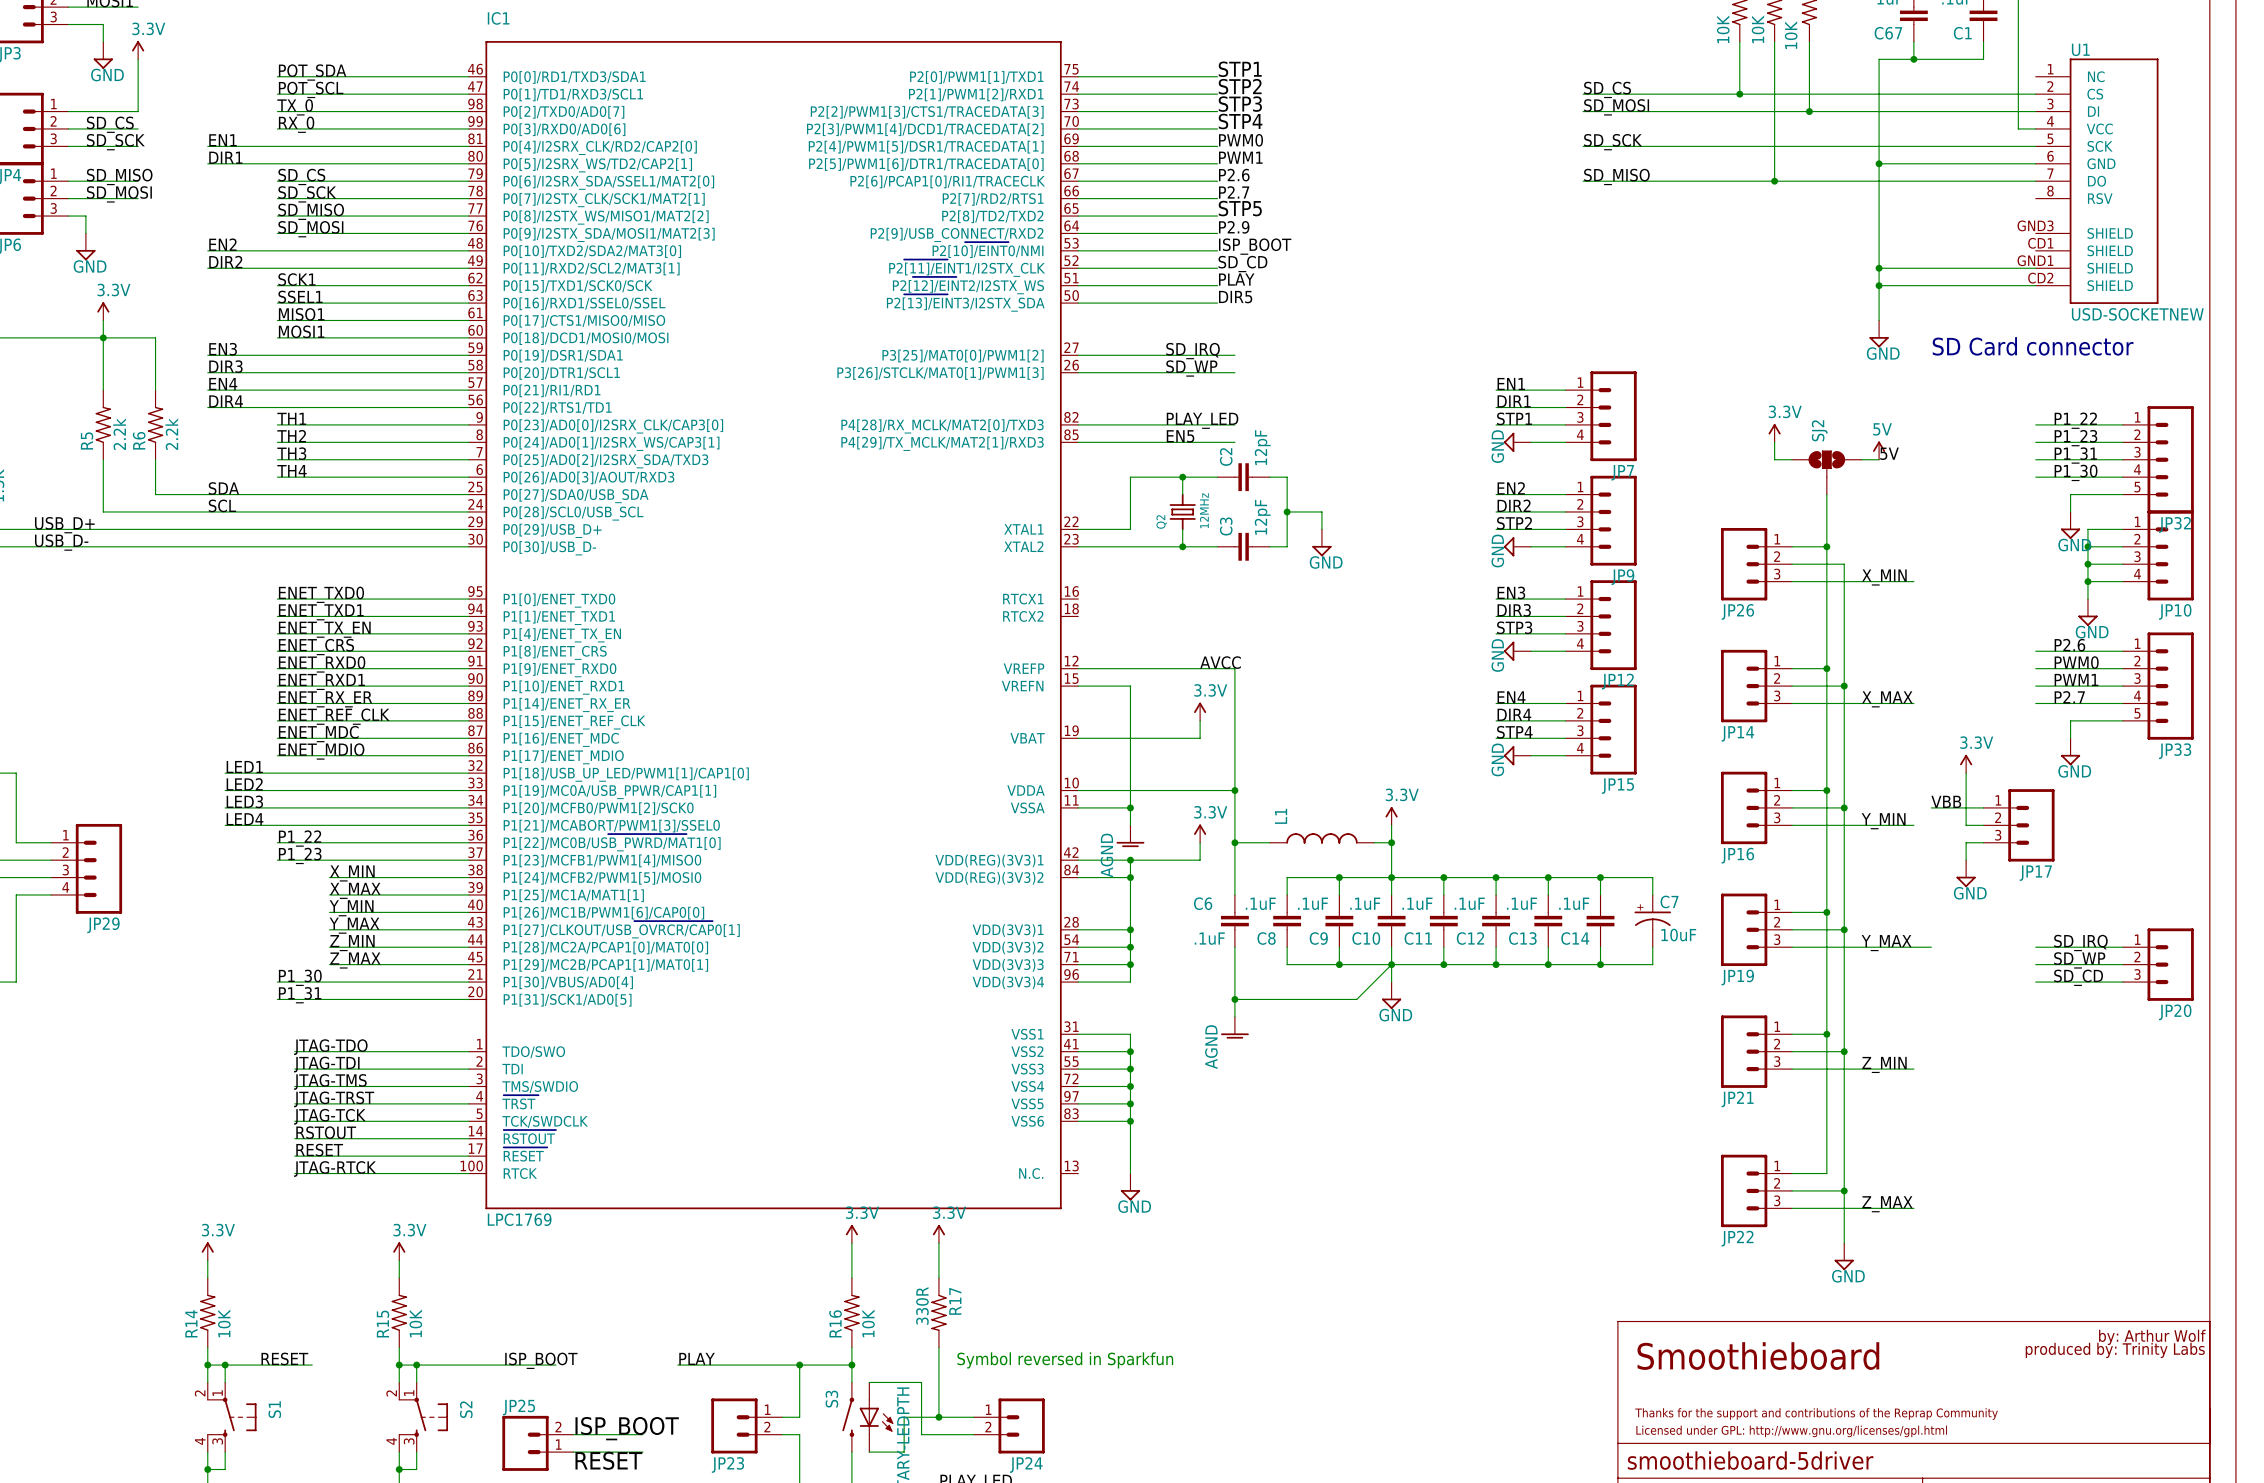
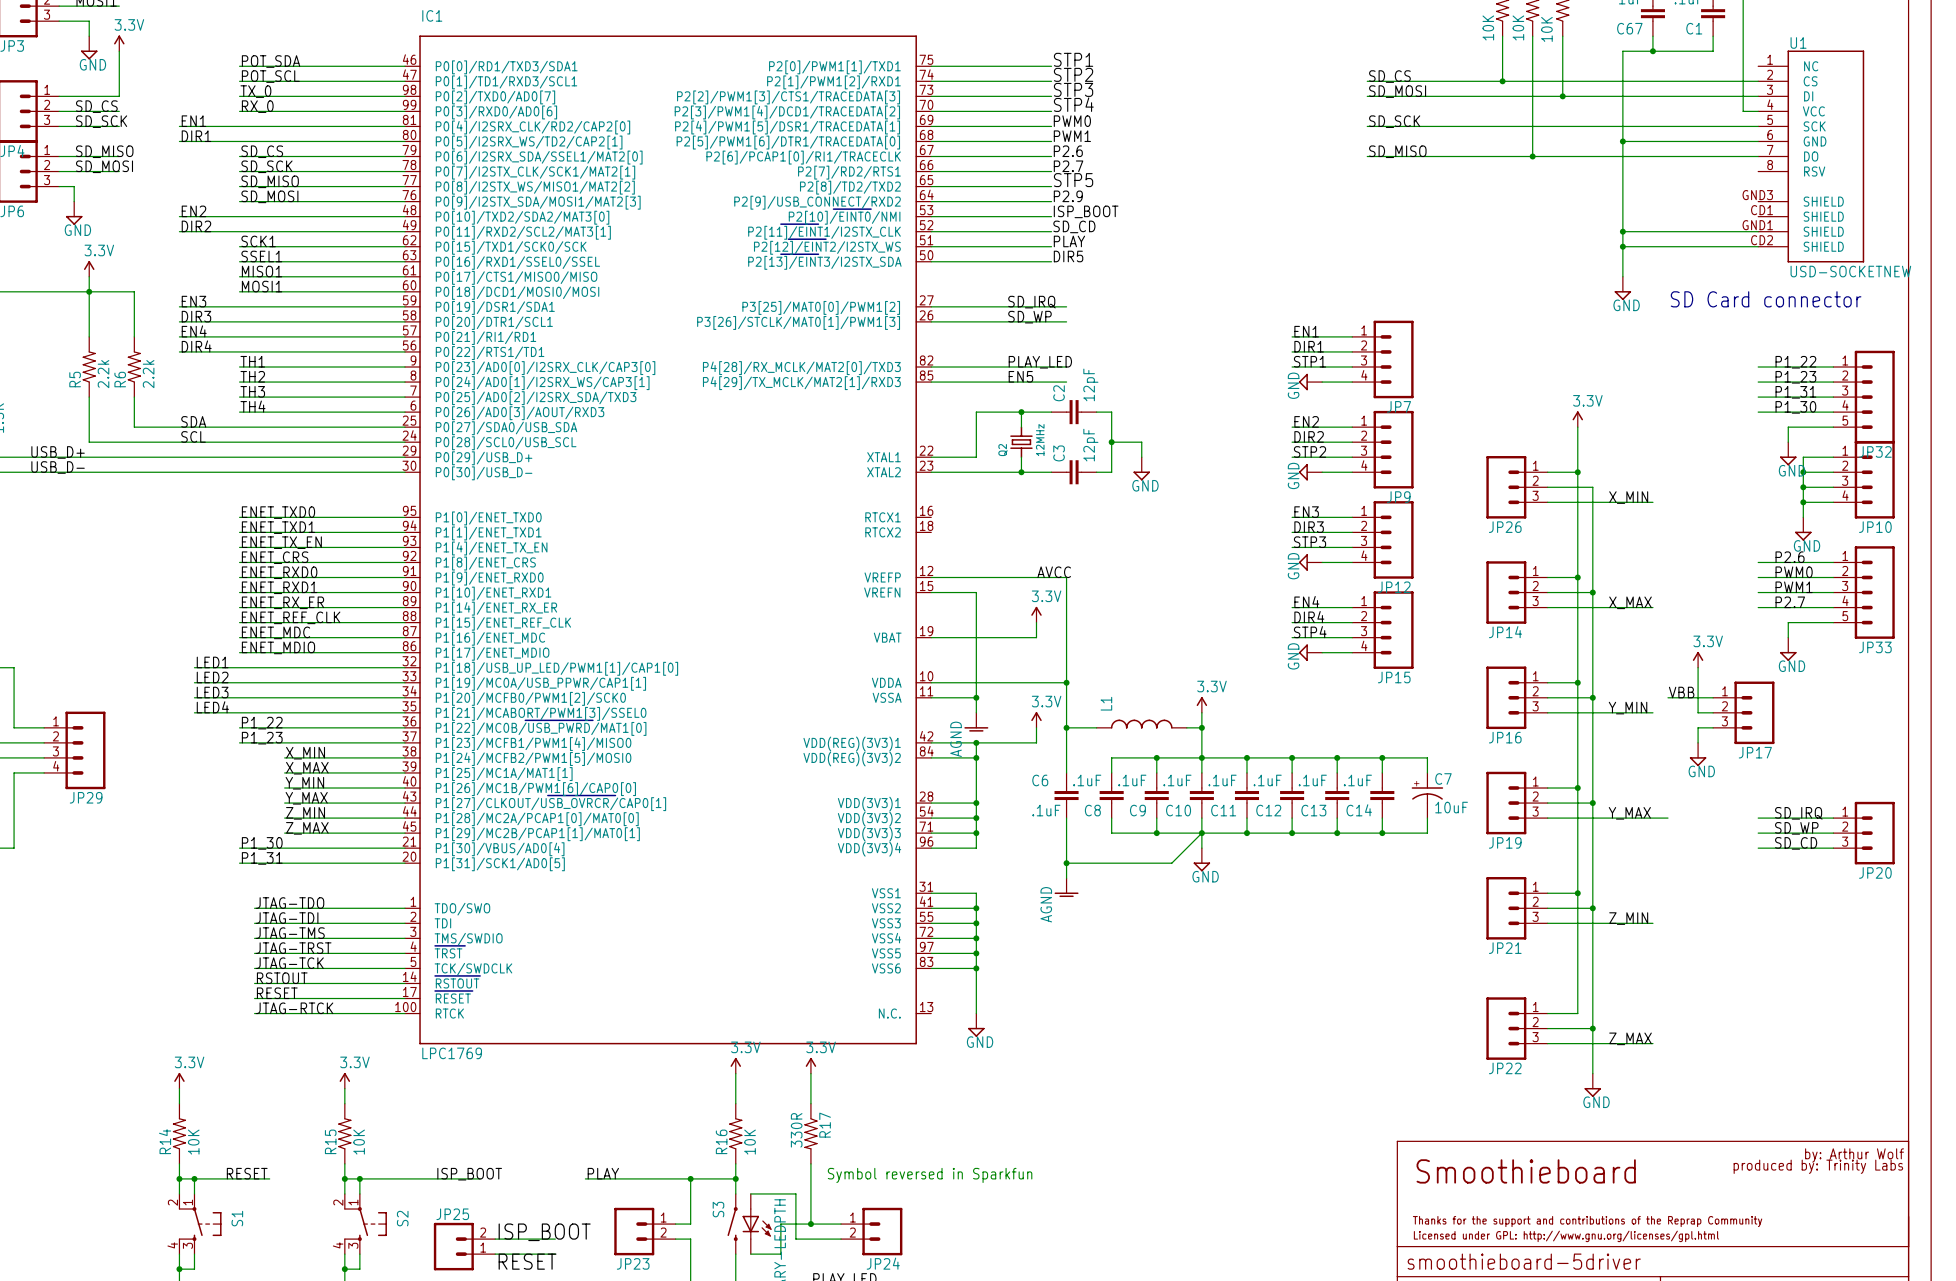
power symbol position: 3.3V (1774, 433) -> 3.3V (1577, 419)
wire: (1774, 442) (1774, 459) (1792, 459) -> none
power symbol: 5V (1879, 450) -> none
label: 5V (1889, 453) -> none
wire: (1861, 459) (1879, 459) -> none
SJ2: (1826, 472) -> none

